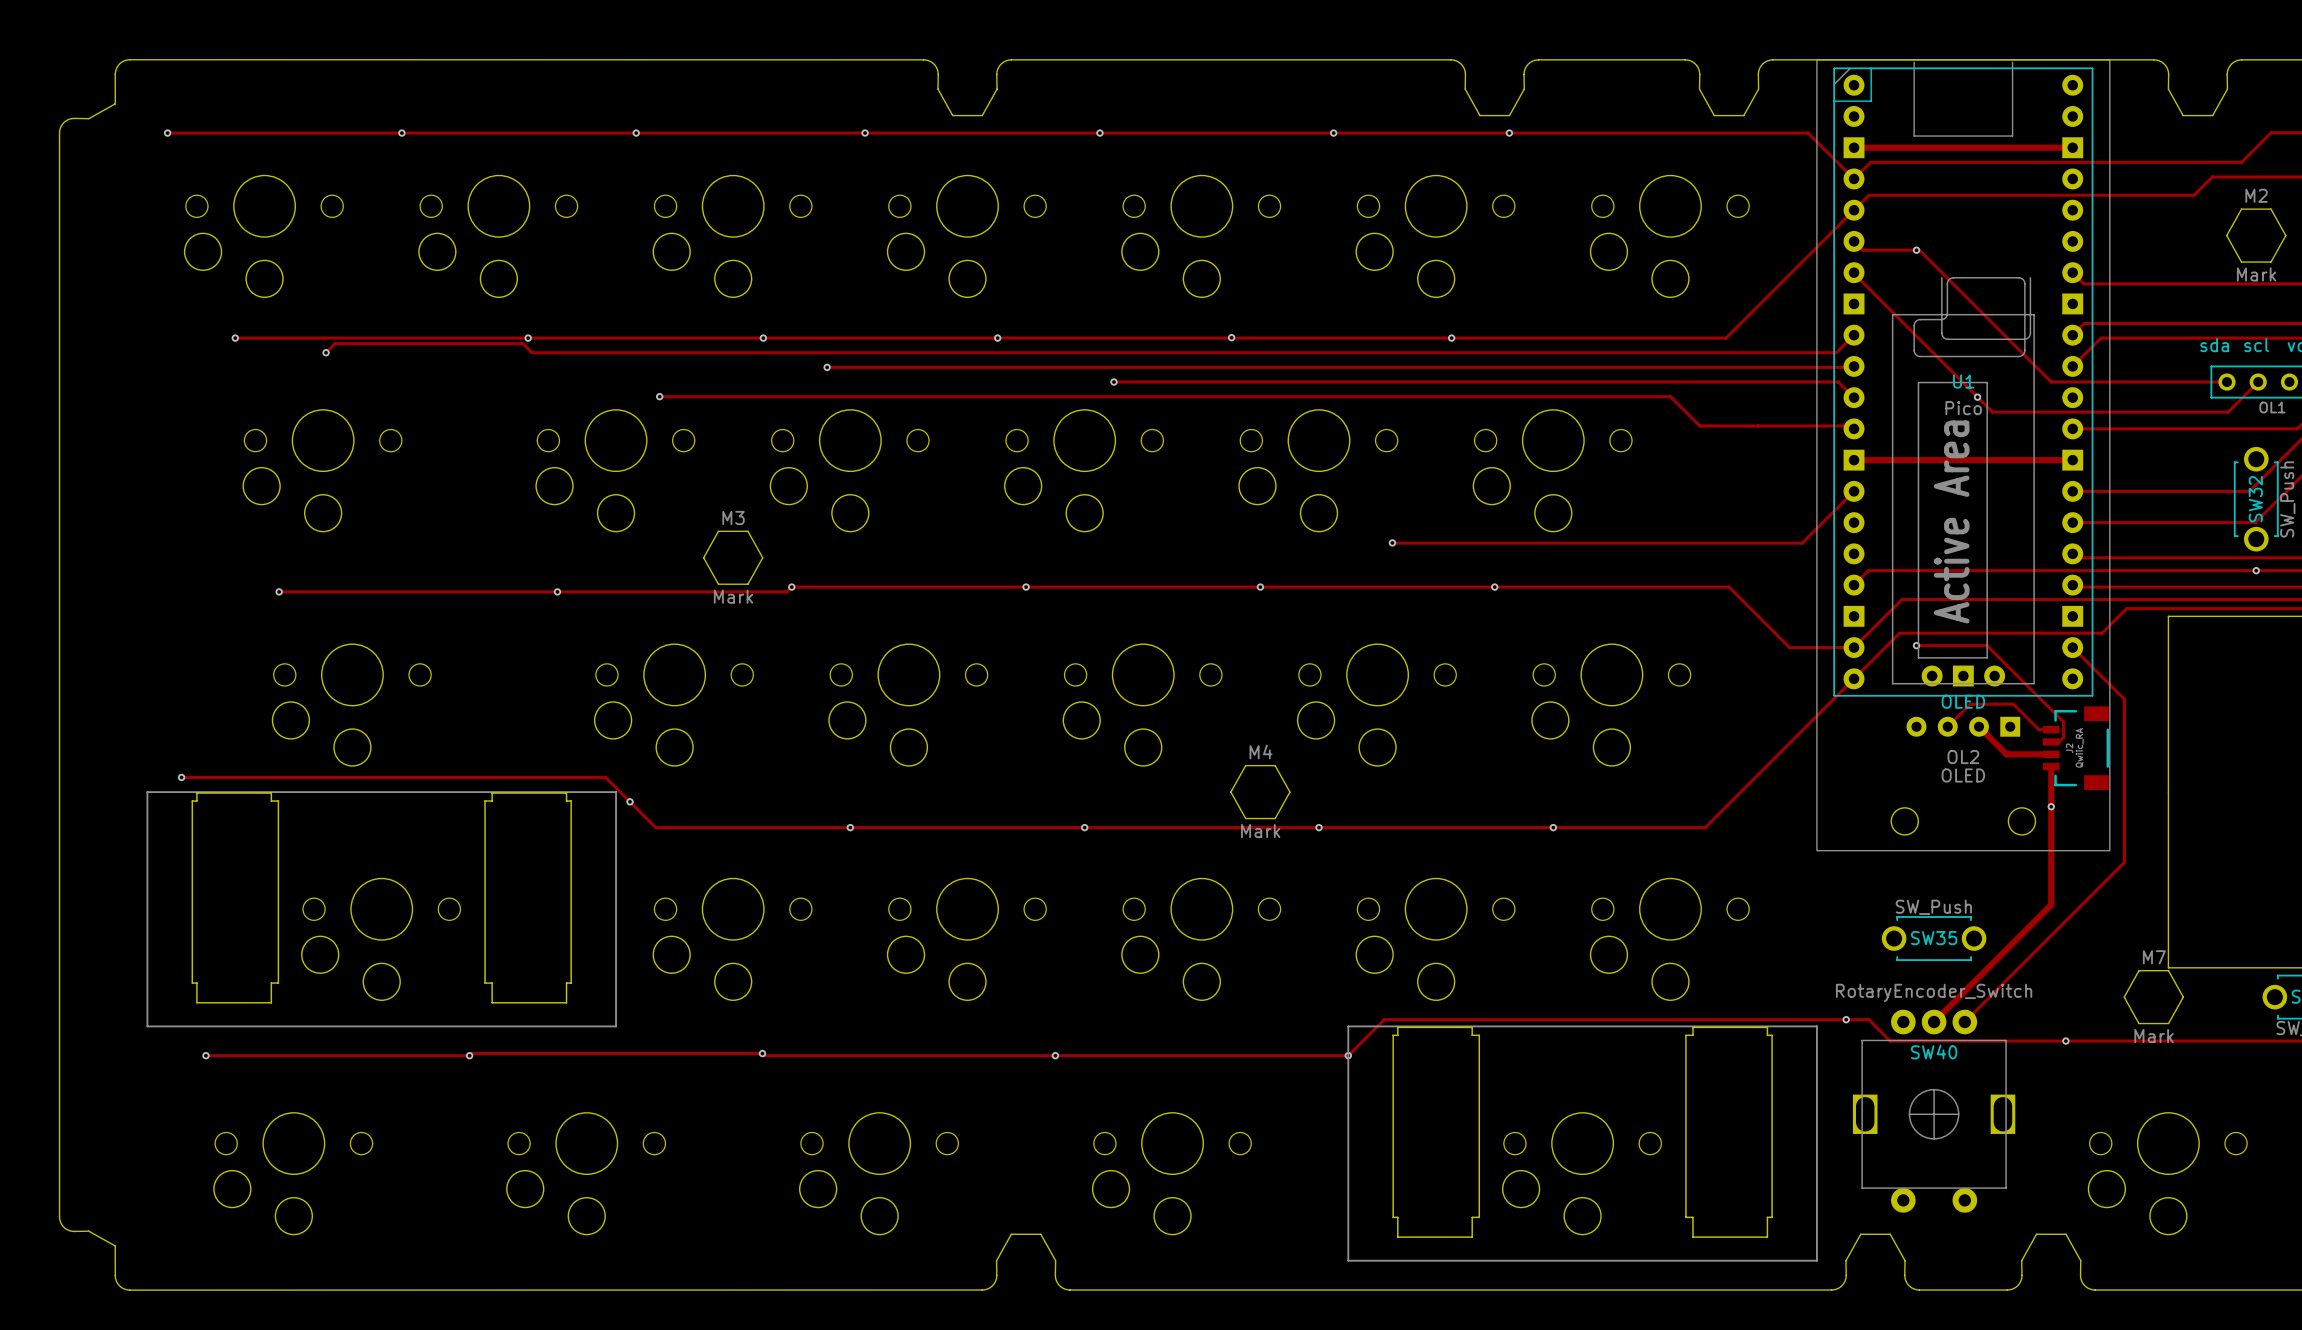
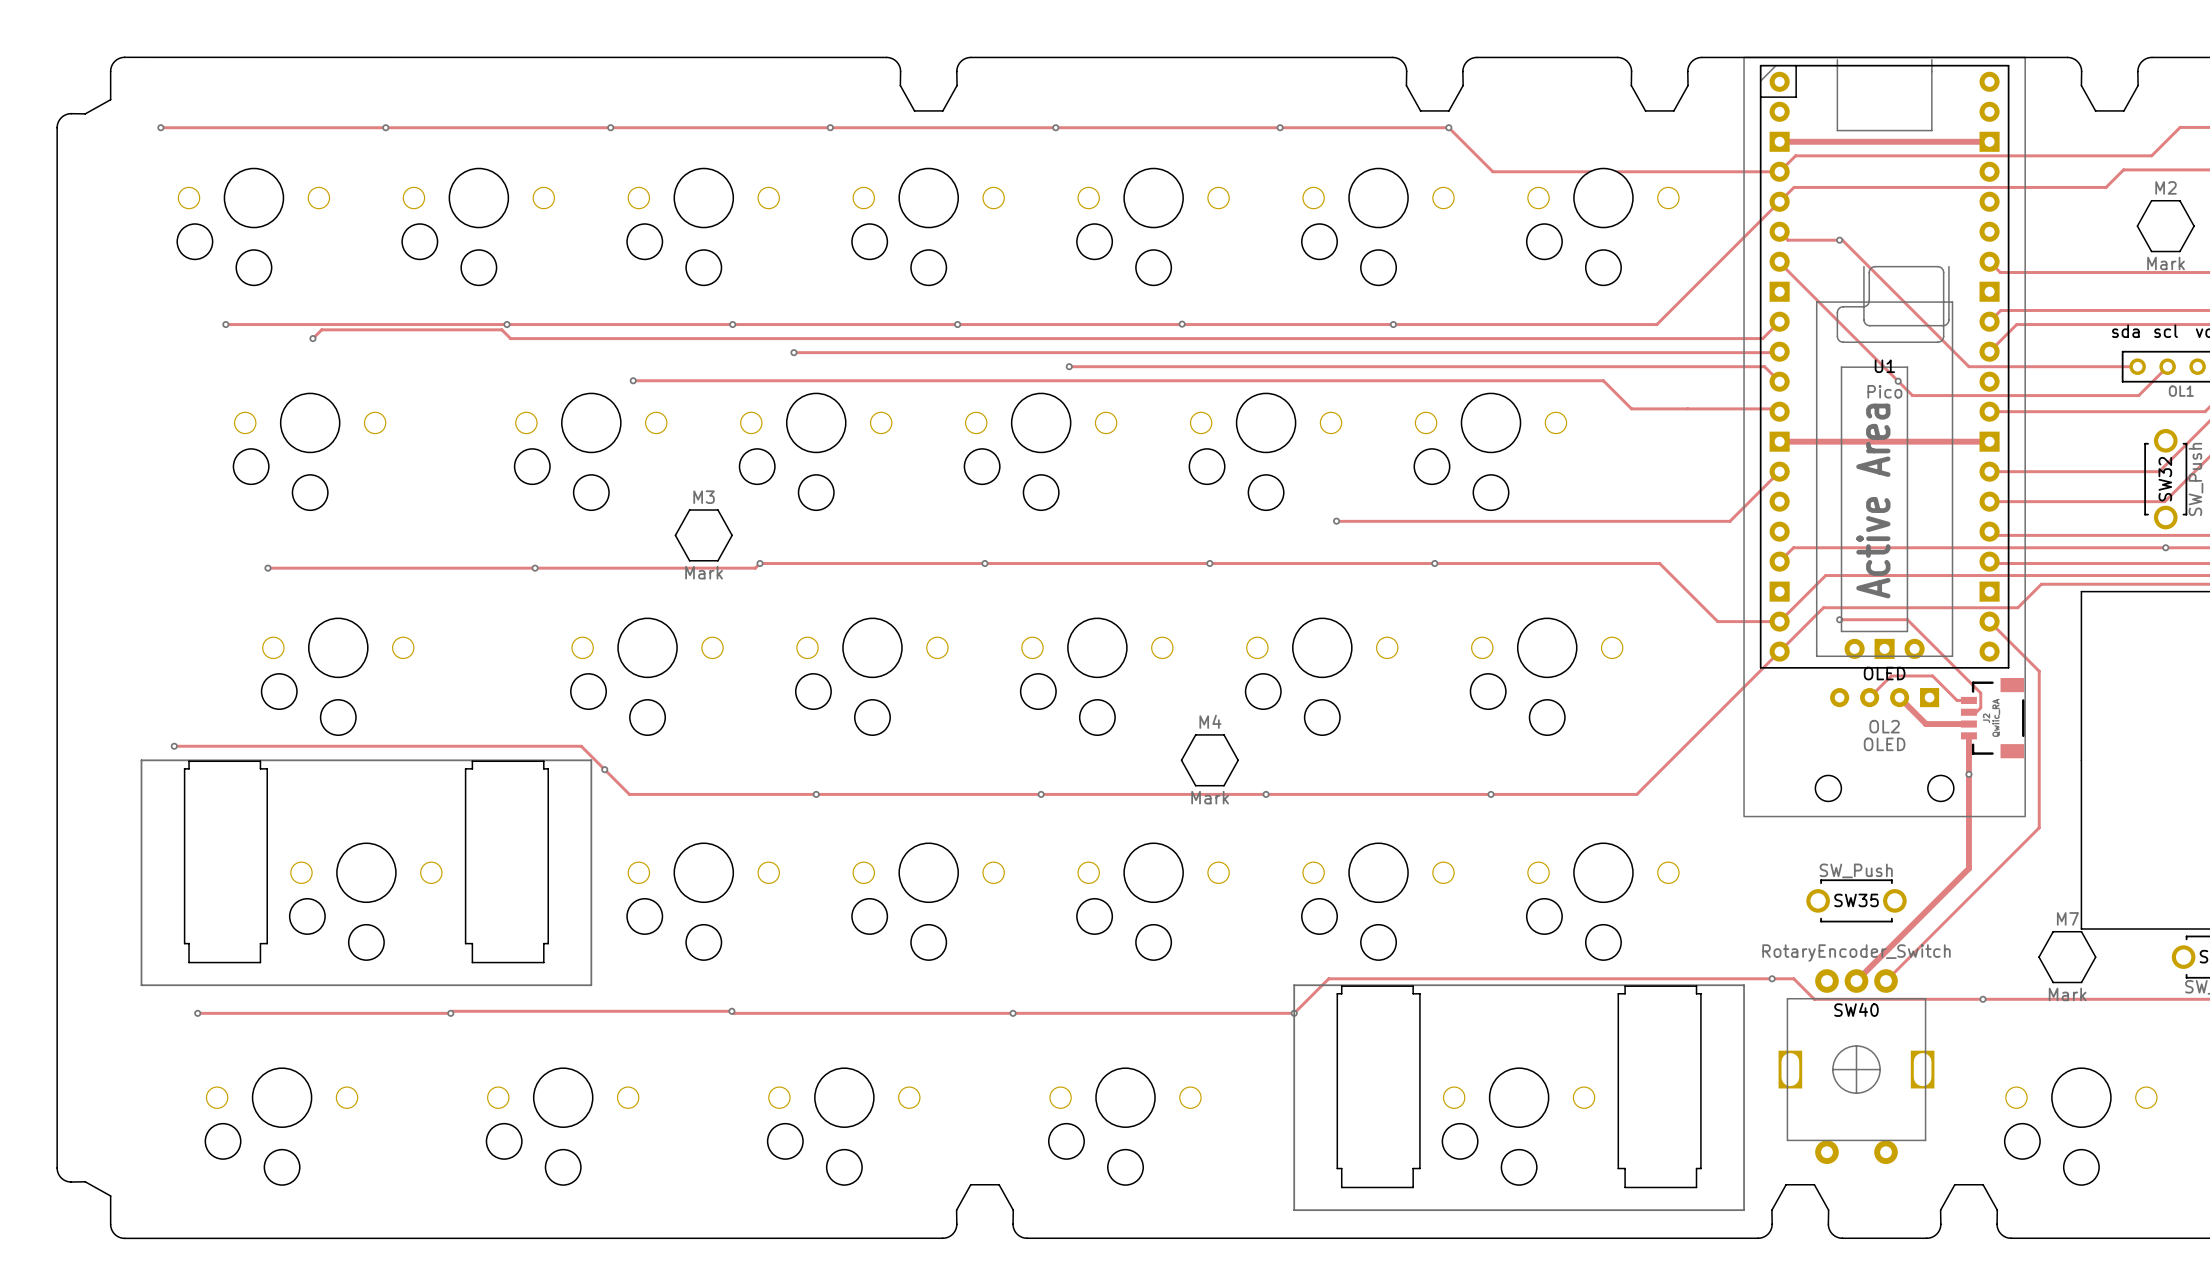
track: (1509, 133) (1808, 133) (1854, 178) -> (1448, 127) (1492, 171) (1779, 171)

